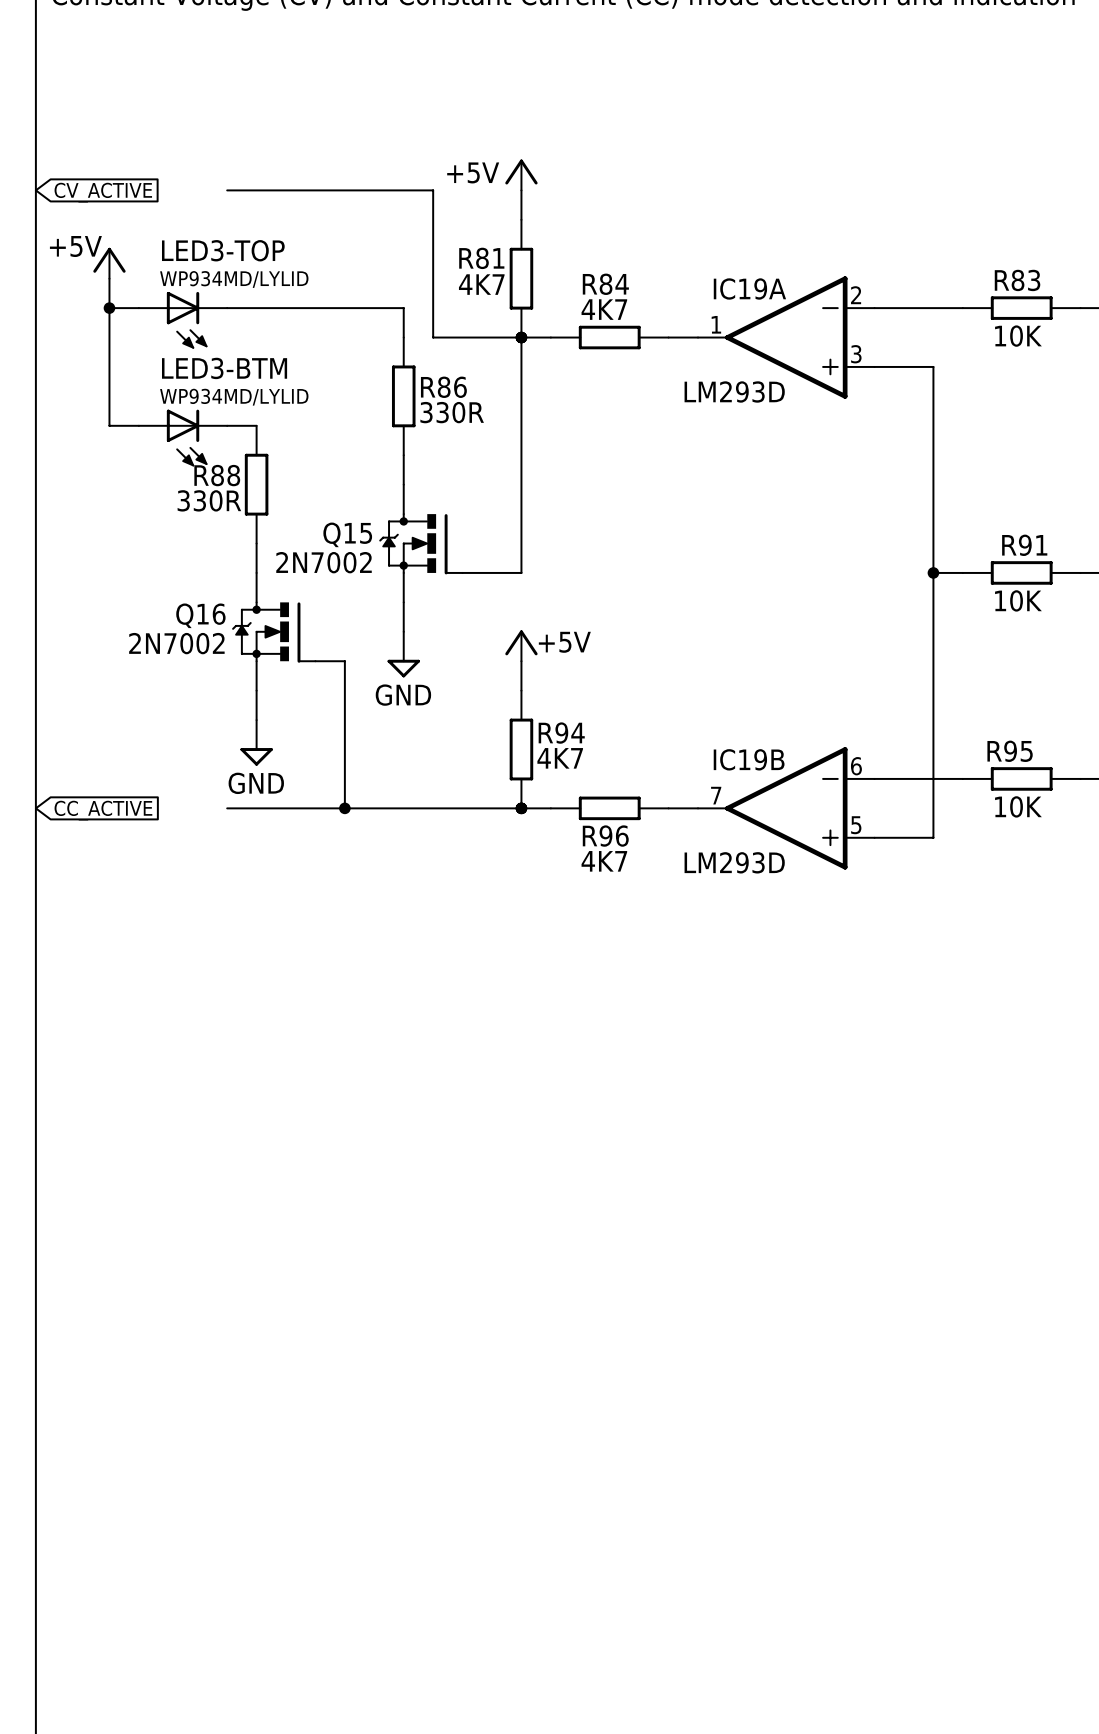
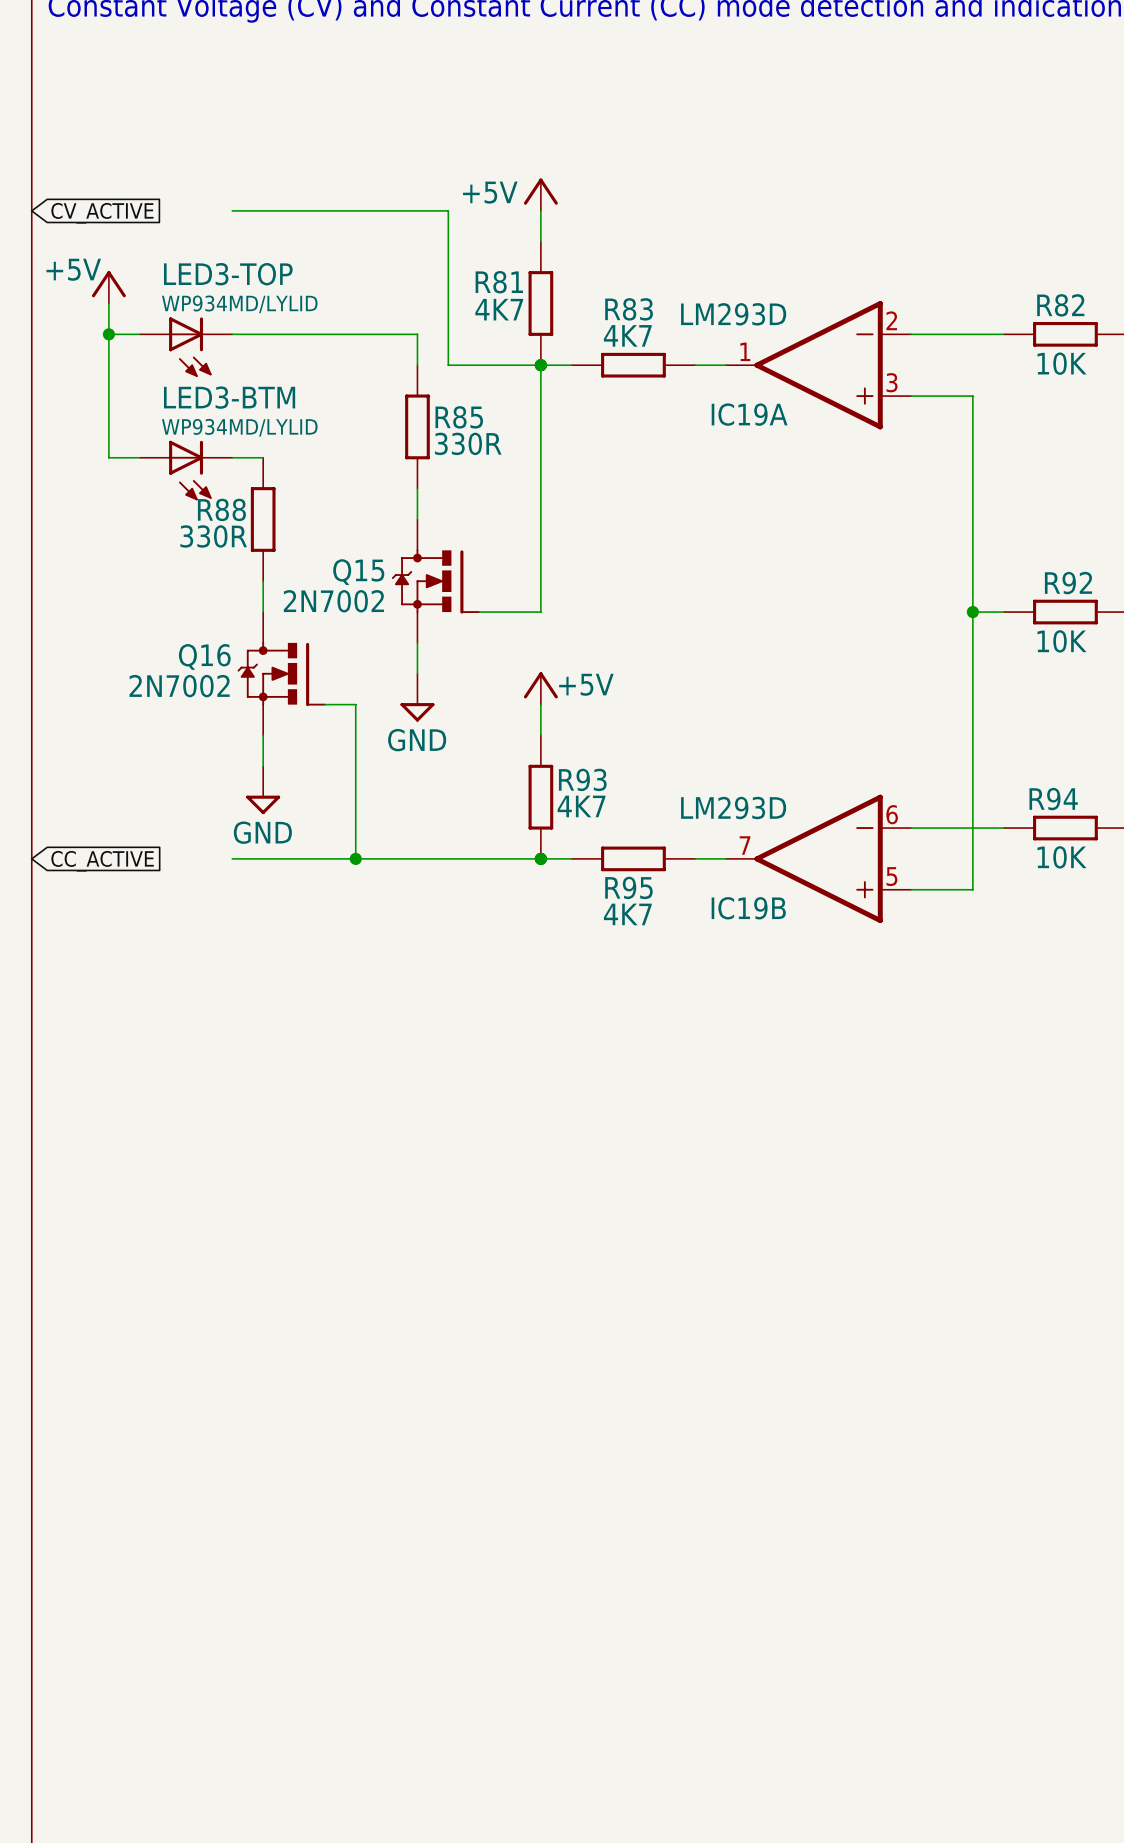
R83 name: R83 (1017, 280) -> R82 (1060, 305)
R84 name: R84 (605, 284) -> R83 (629, 309)
IC19A name position: IC19A (749, 288) -> IC19A (749, 414)
R86 name: R86 (443, 387) -> R85 (459, 417)
IC19A value position: LM293D (734, 391) -> LM293D (733, 314)
R91 name: R91 (1024, 545) -> R92 (1068, 583)
R94 name: R94 (561, 733) -> R93 (582, 779)
R95 name: R95 (1010, 751) -> R94 (1053, 799)
IC19B name position: IC19B (749, 759) -> IC19B (748, 908)
R96 name: R96 (605, 836) -> R95 (628, 887)
IC19B value position: LM293D (734, 862) -> LM293D (733, 808)

